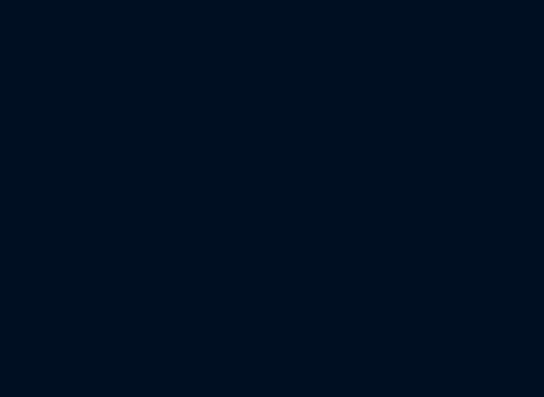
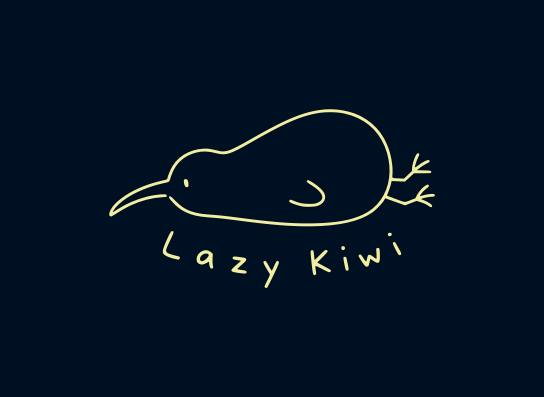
drawing: none -> [109, 109, 435, 289]

